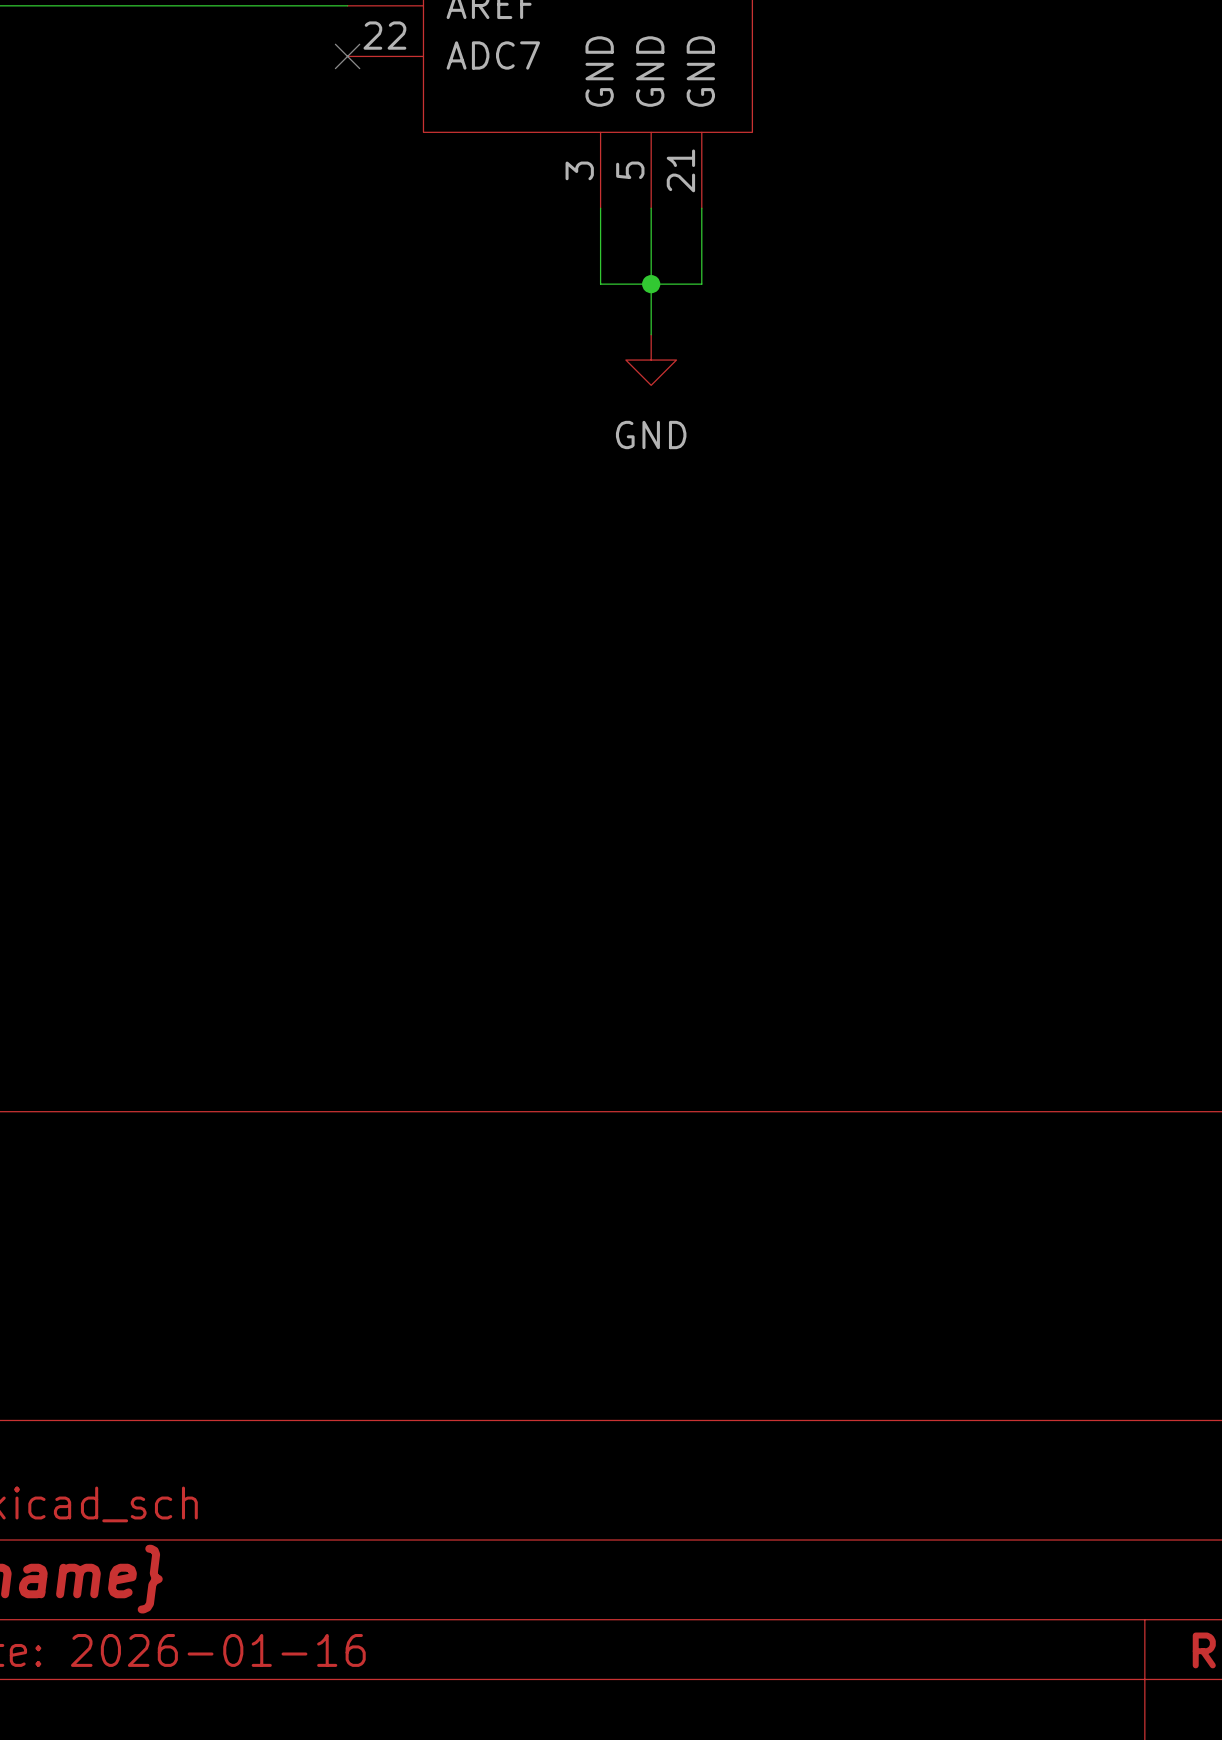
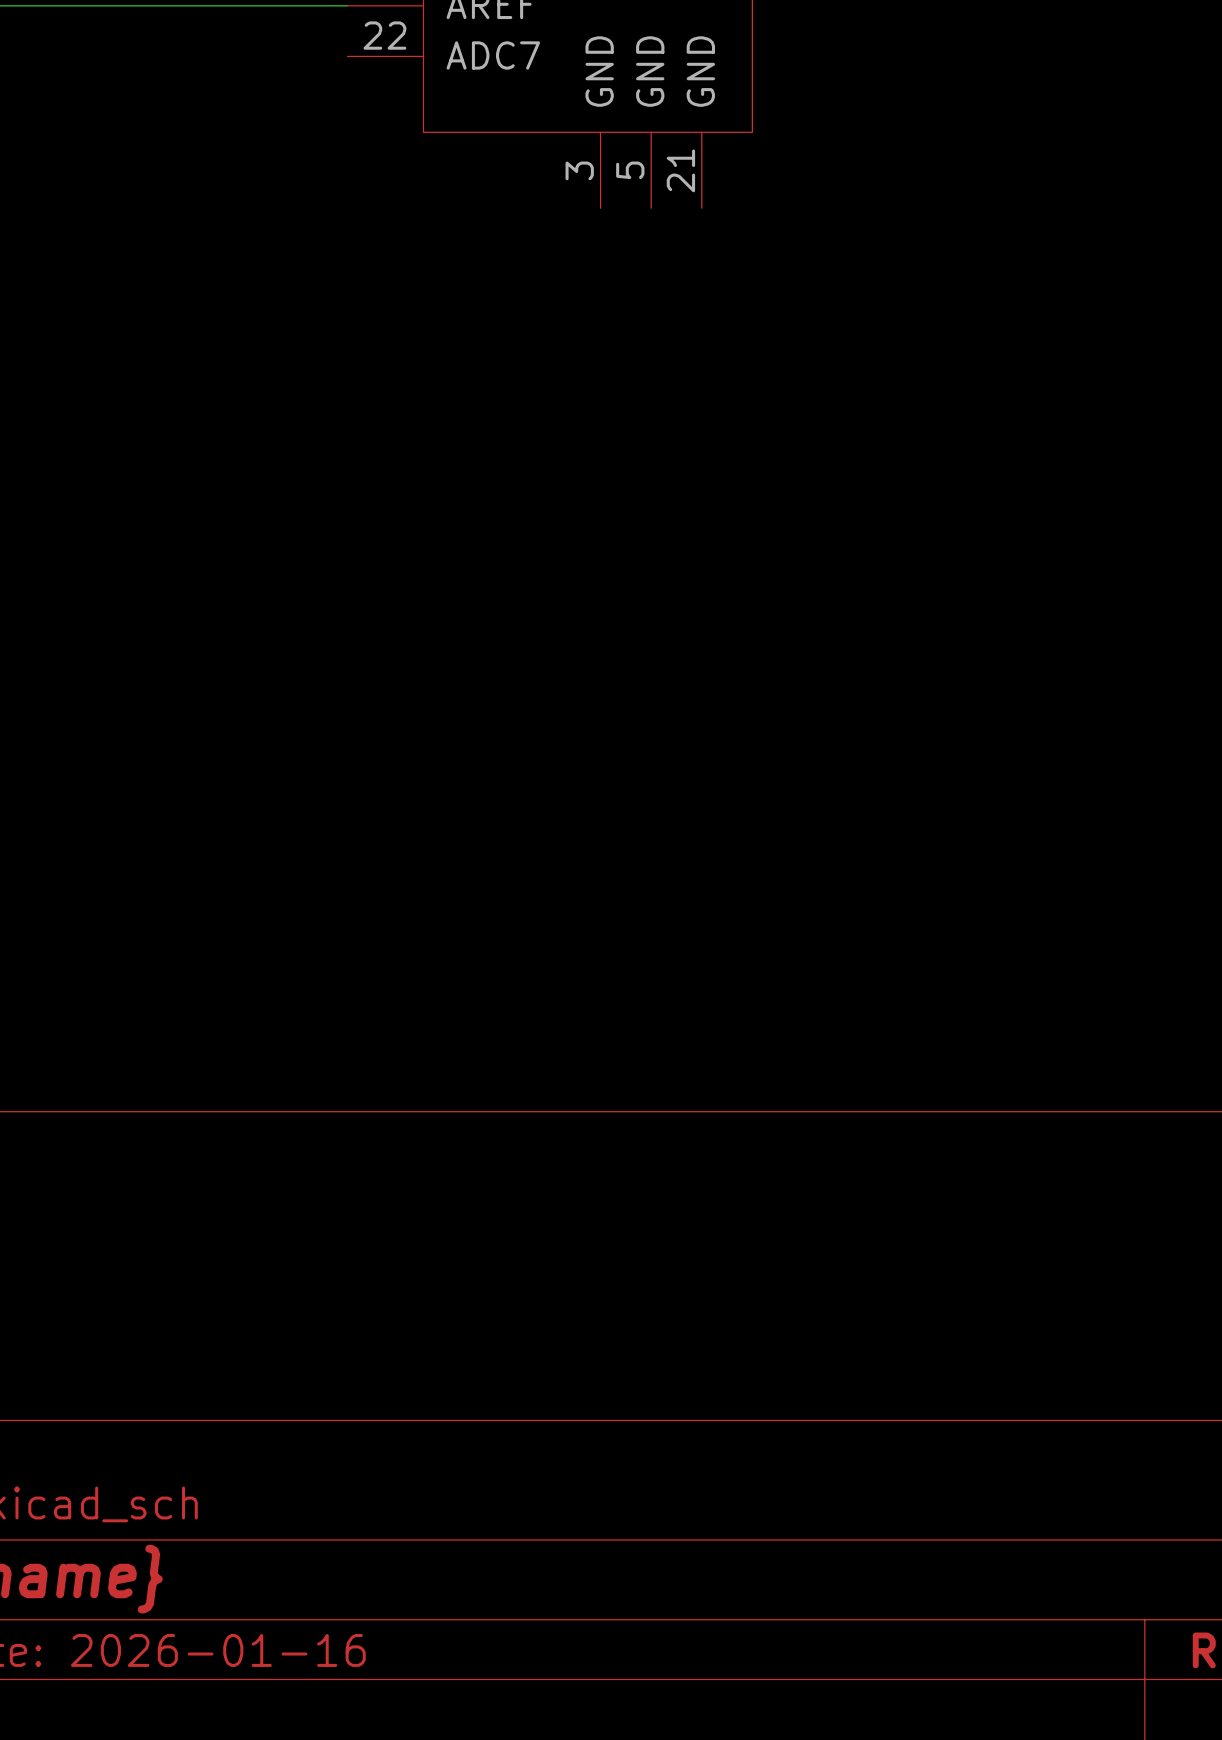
no-connect mark: (347, 56) -> none
wire: (600, 208) (600, 284) (701, 284) (701, 208) -> none
wire: (651, 208) (651, 334) -> none
junction: (651, 284) -> none
power symbol: GND (651, 360) -> none

